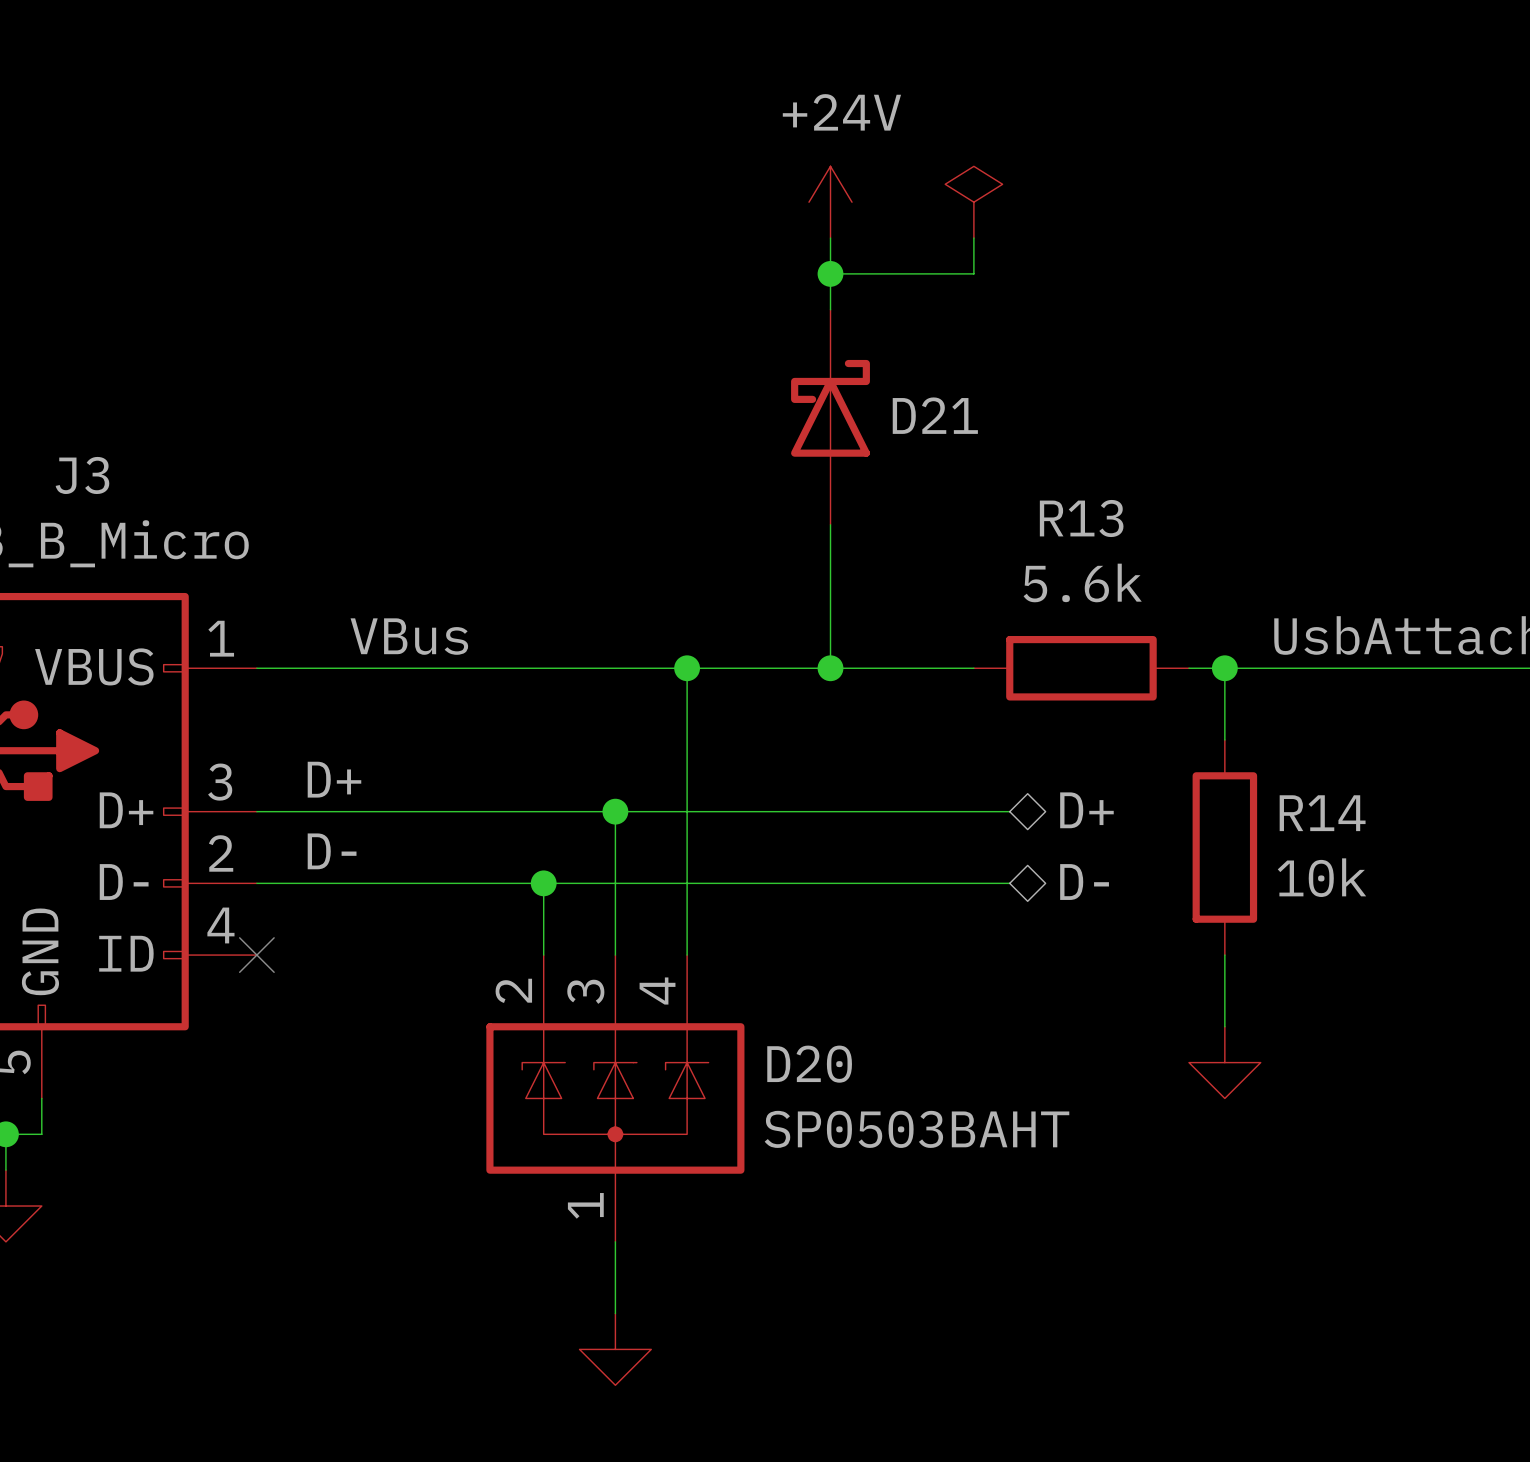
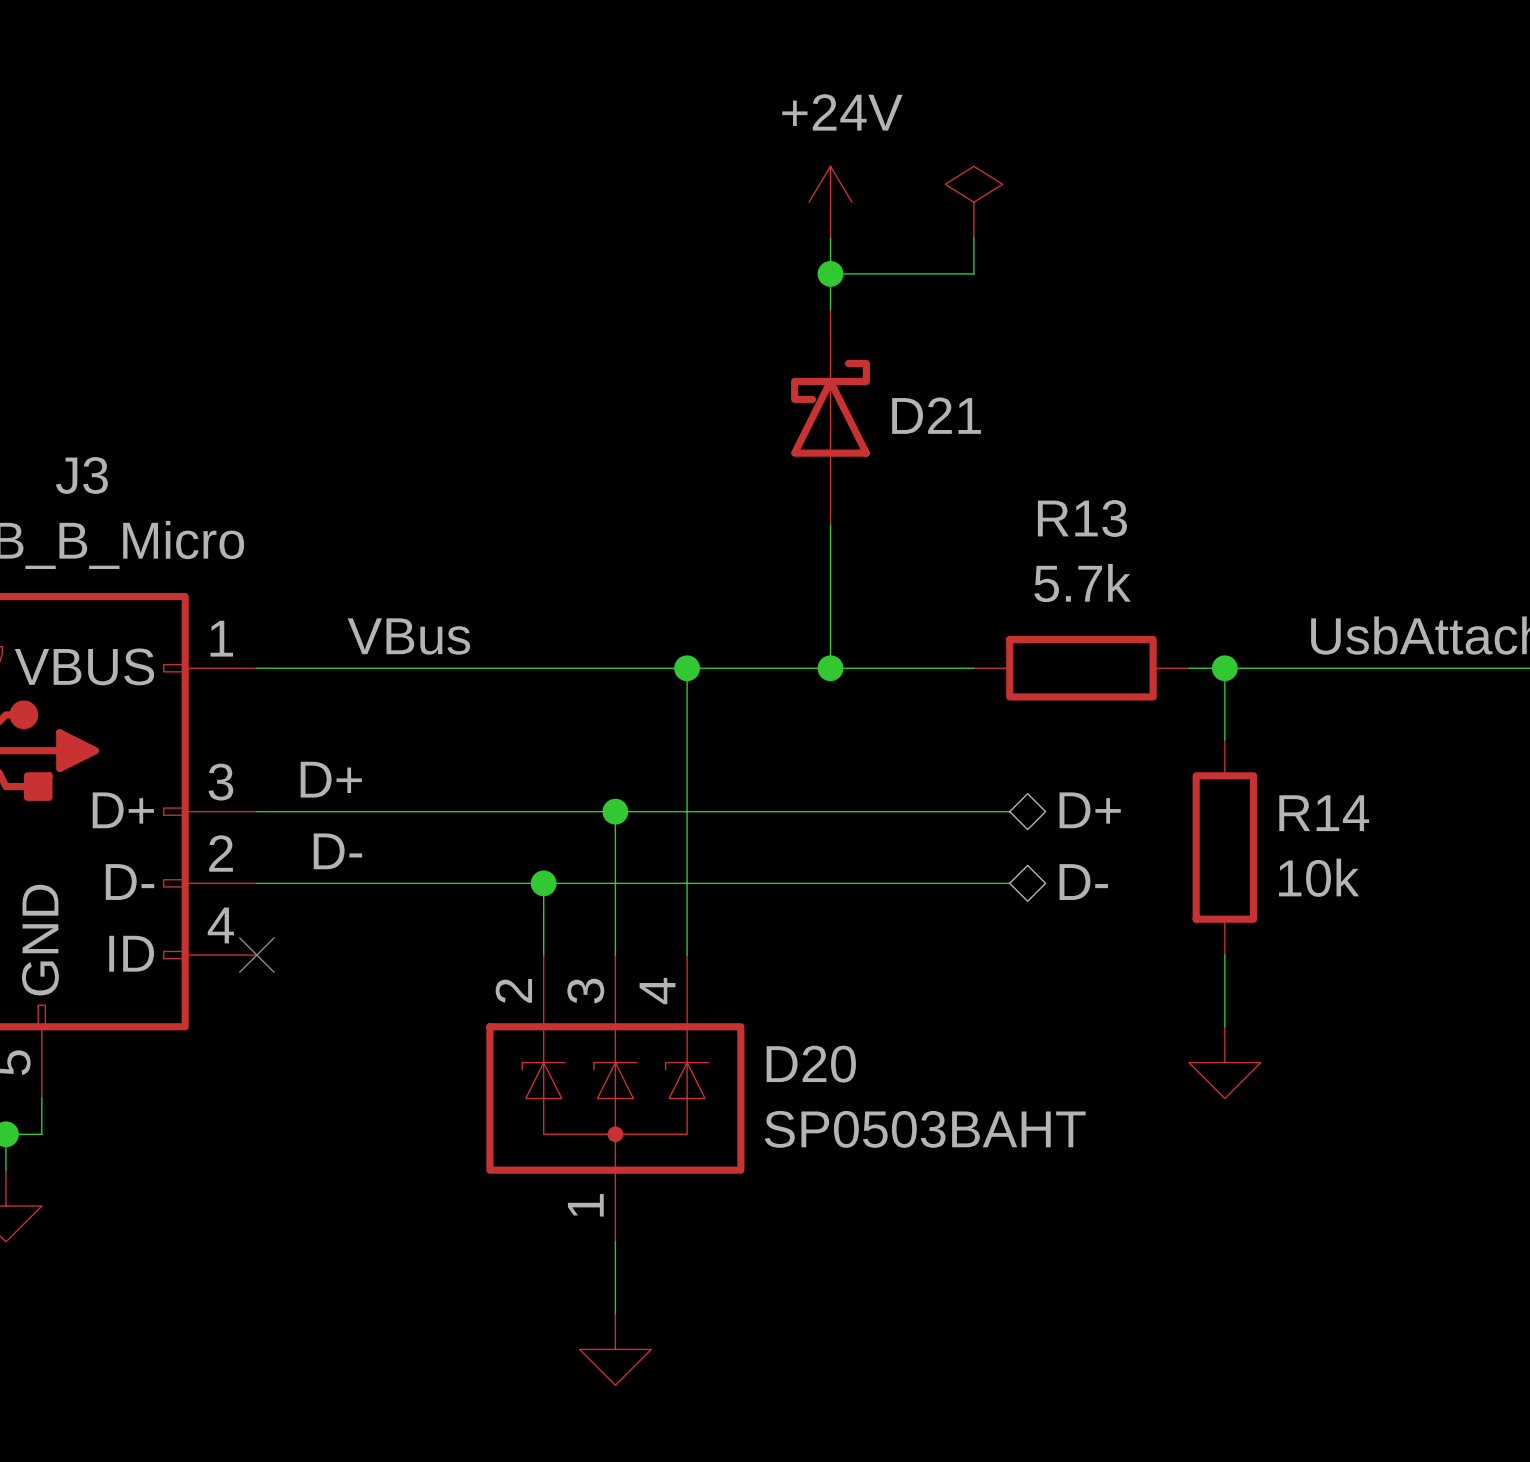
R13 value: 5.6k (1082, 582) -> 5.7k (1082, 583)

